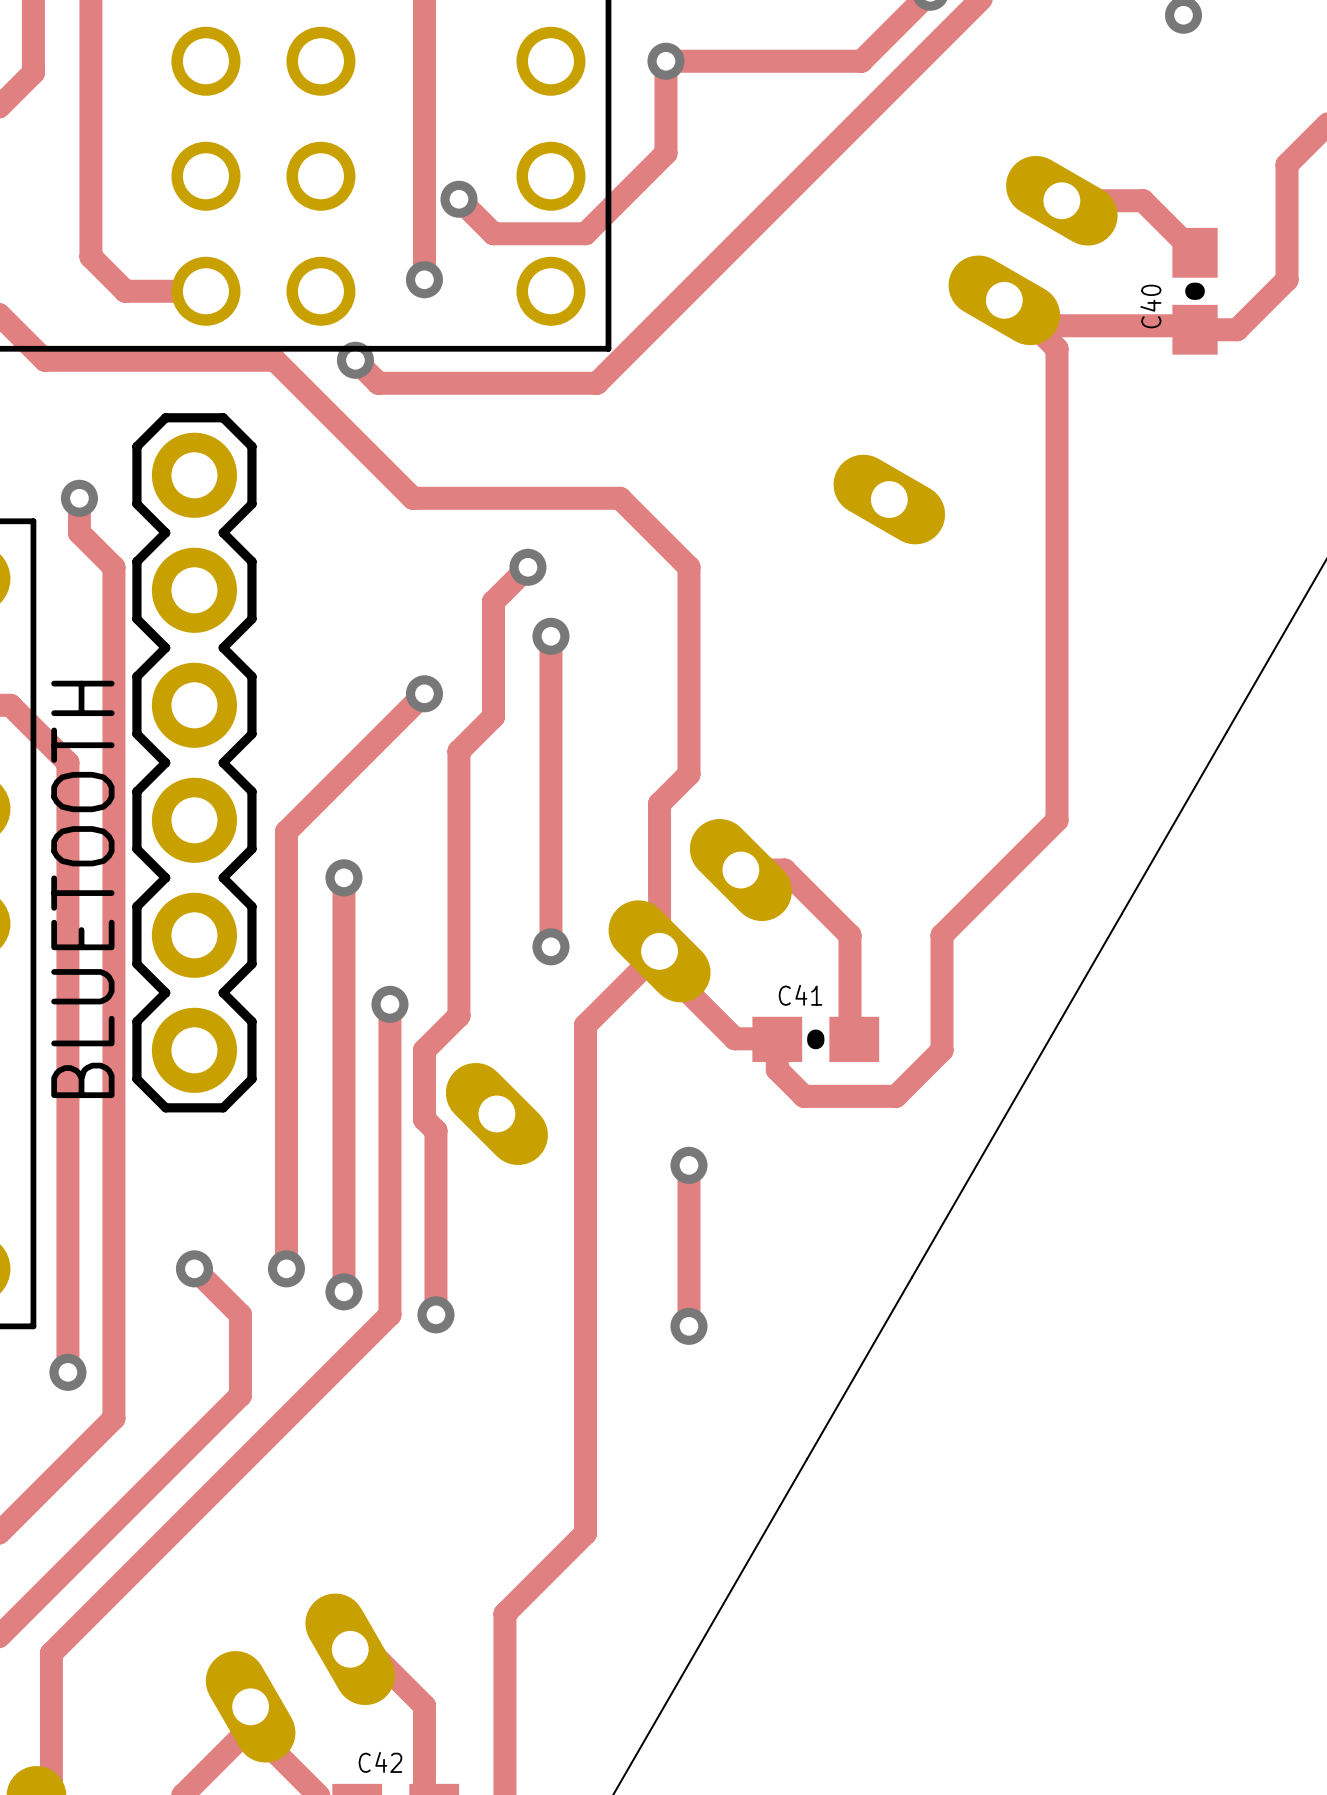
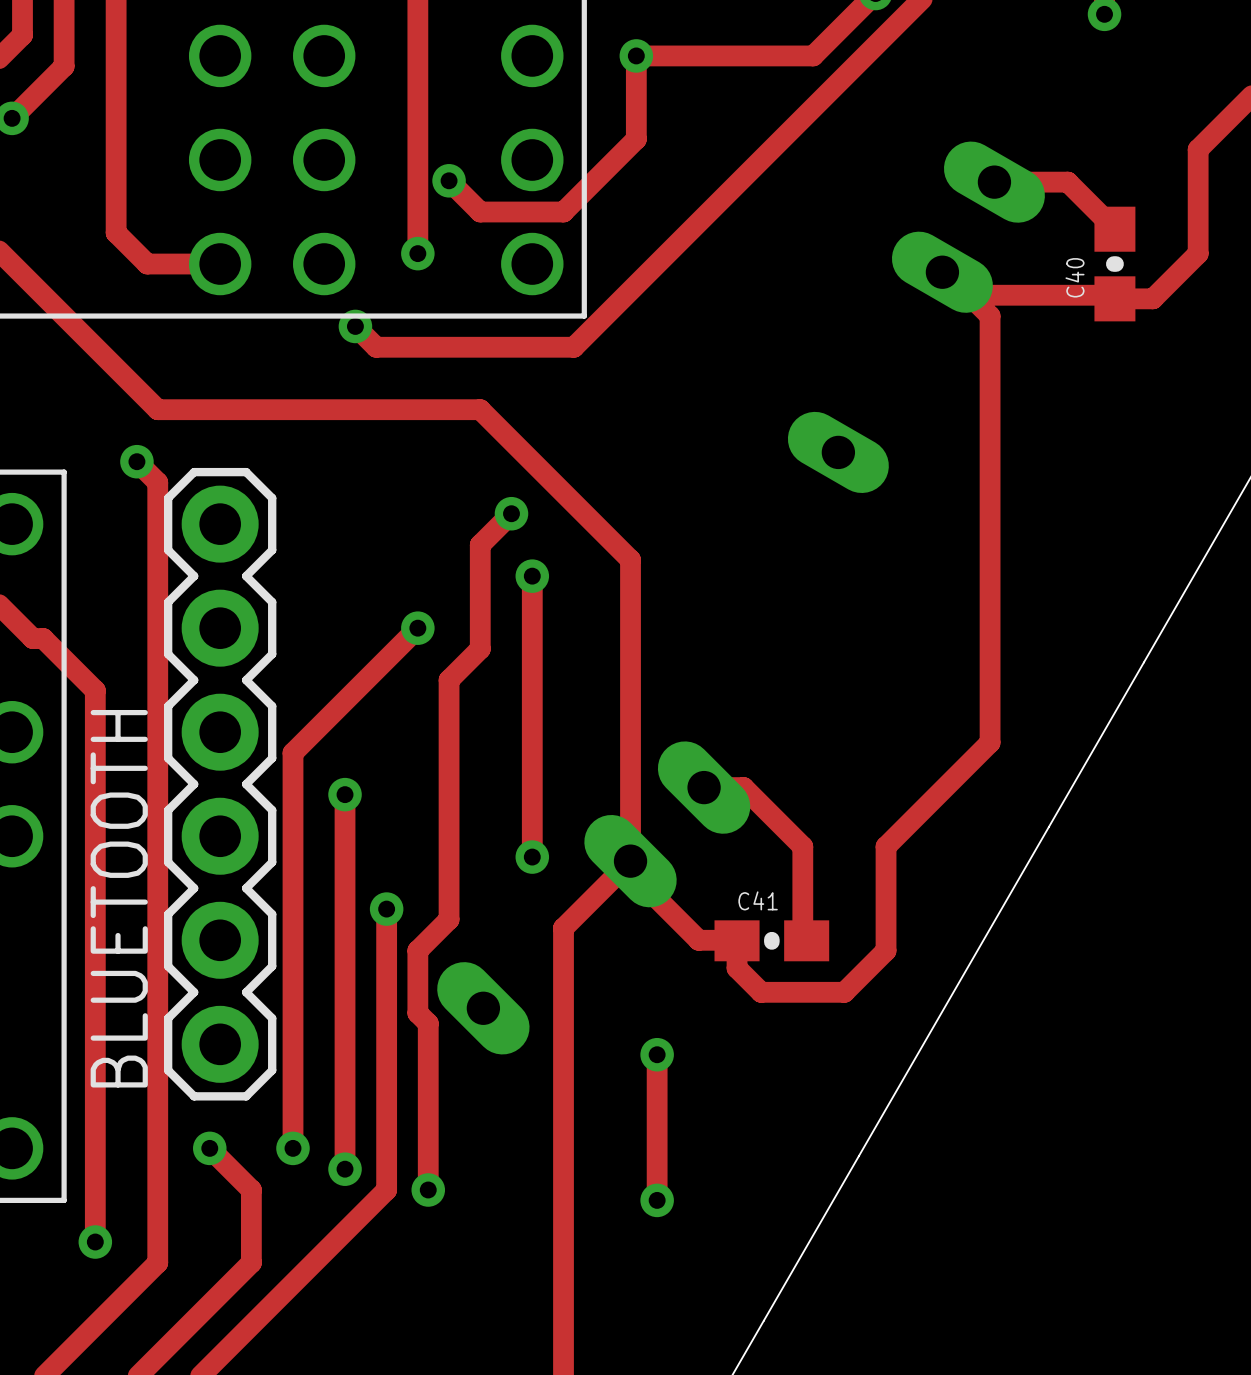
track: (44, 360) (274, 360) (412, 498) (619, 498) (688, 567) (688, 774) (659, 803) -> (74, 326) (157, 409) (480, 409) (630, 559) (630, 727)
track: (79, 498) (79, 532) (113, 567) (113, 1418) -> (136, 461) (157, 482) (157, 1262) (136, 1283)
via position: (79, 498) -> (136, 461)
BLUETOOTH position: (194, 762) -> (220, 784)

